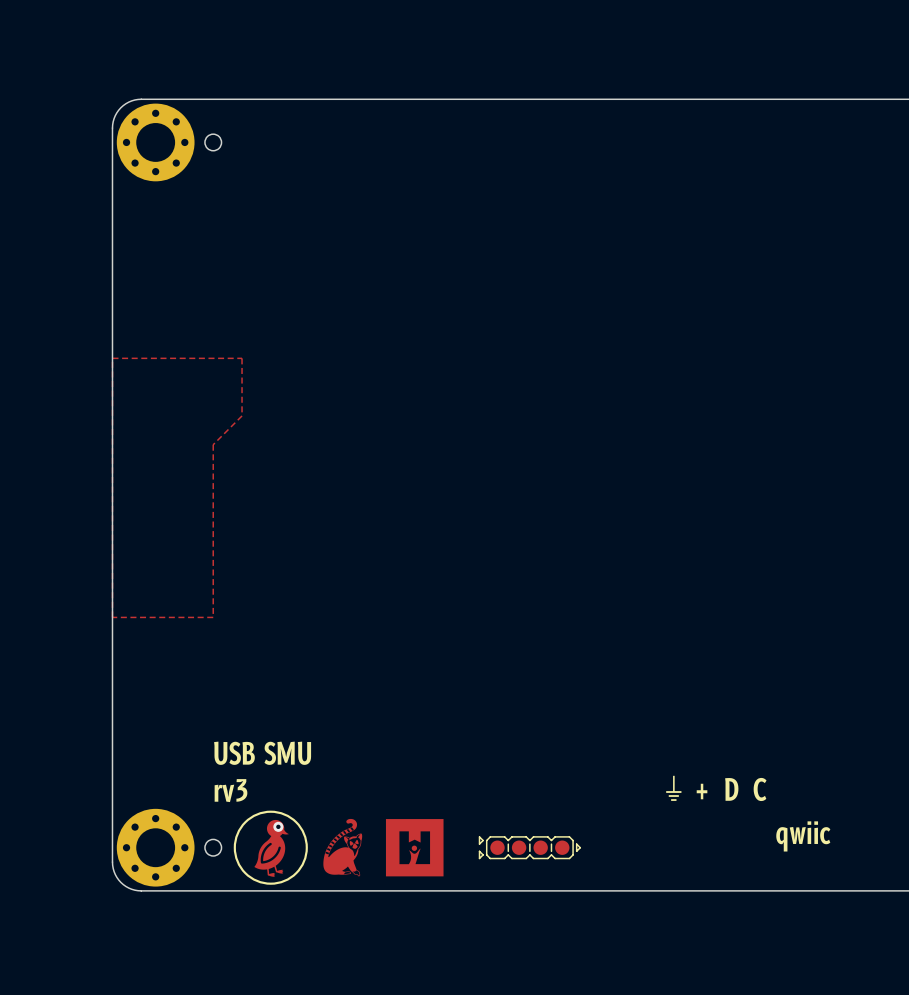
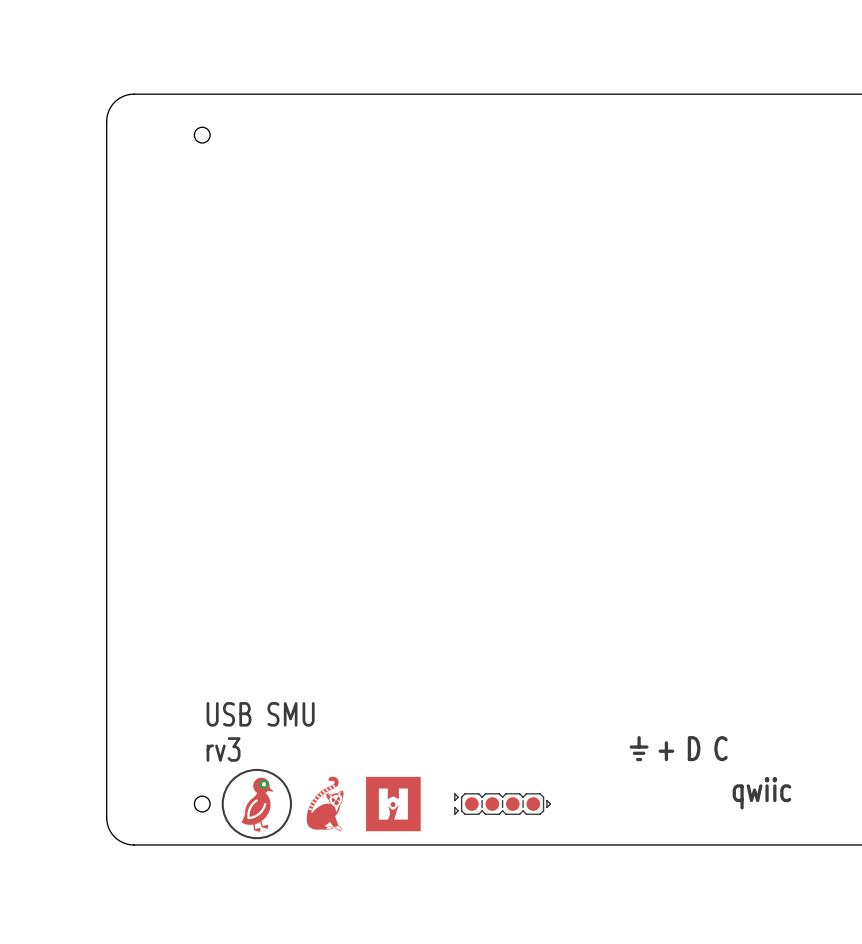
part: (155, 142) -> none
top zone outline: (112, 358) (112, 617) (213, 617) (213, 444) (242, 415) (242, 358) (112, 358) -> none
part: (155, 847) -> none

